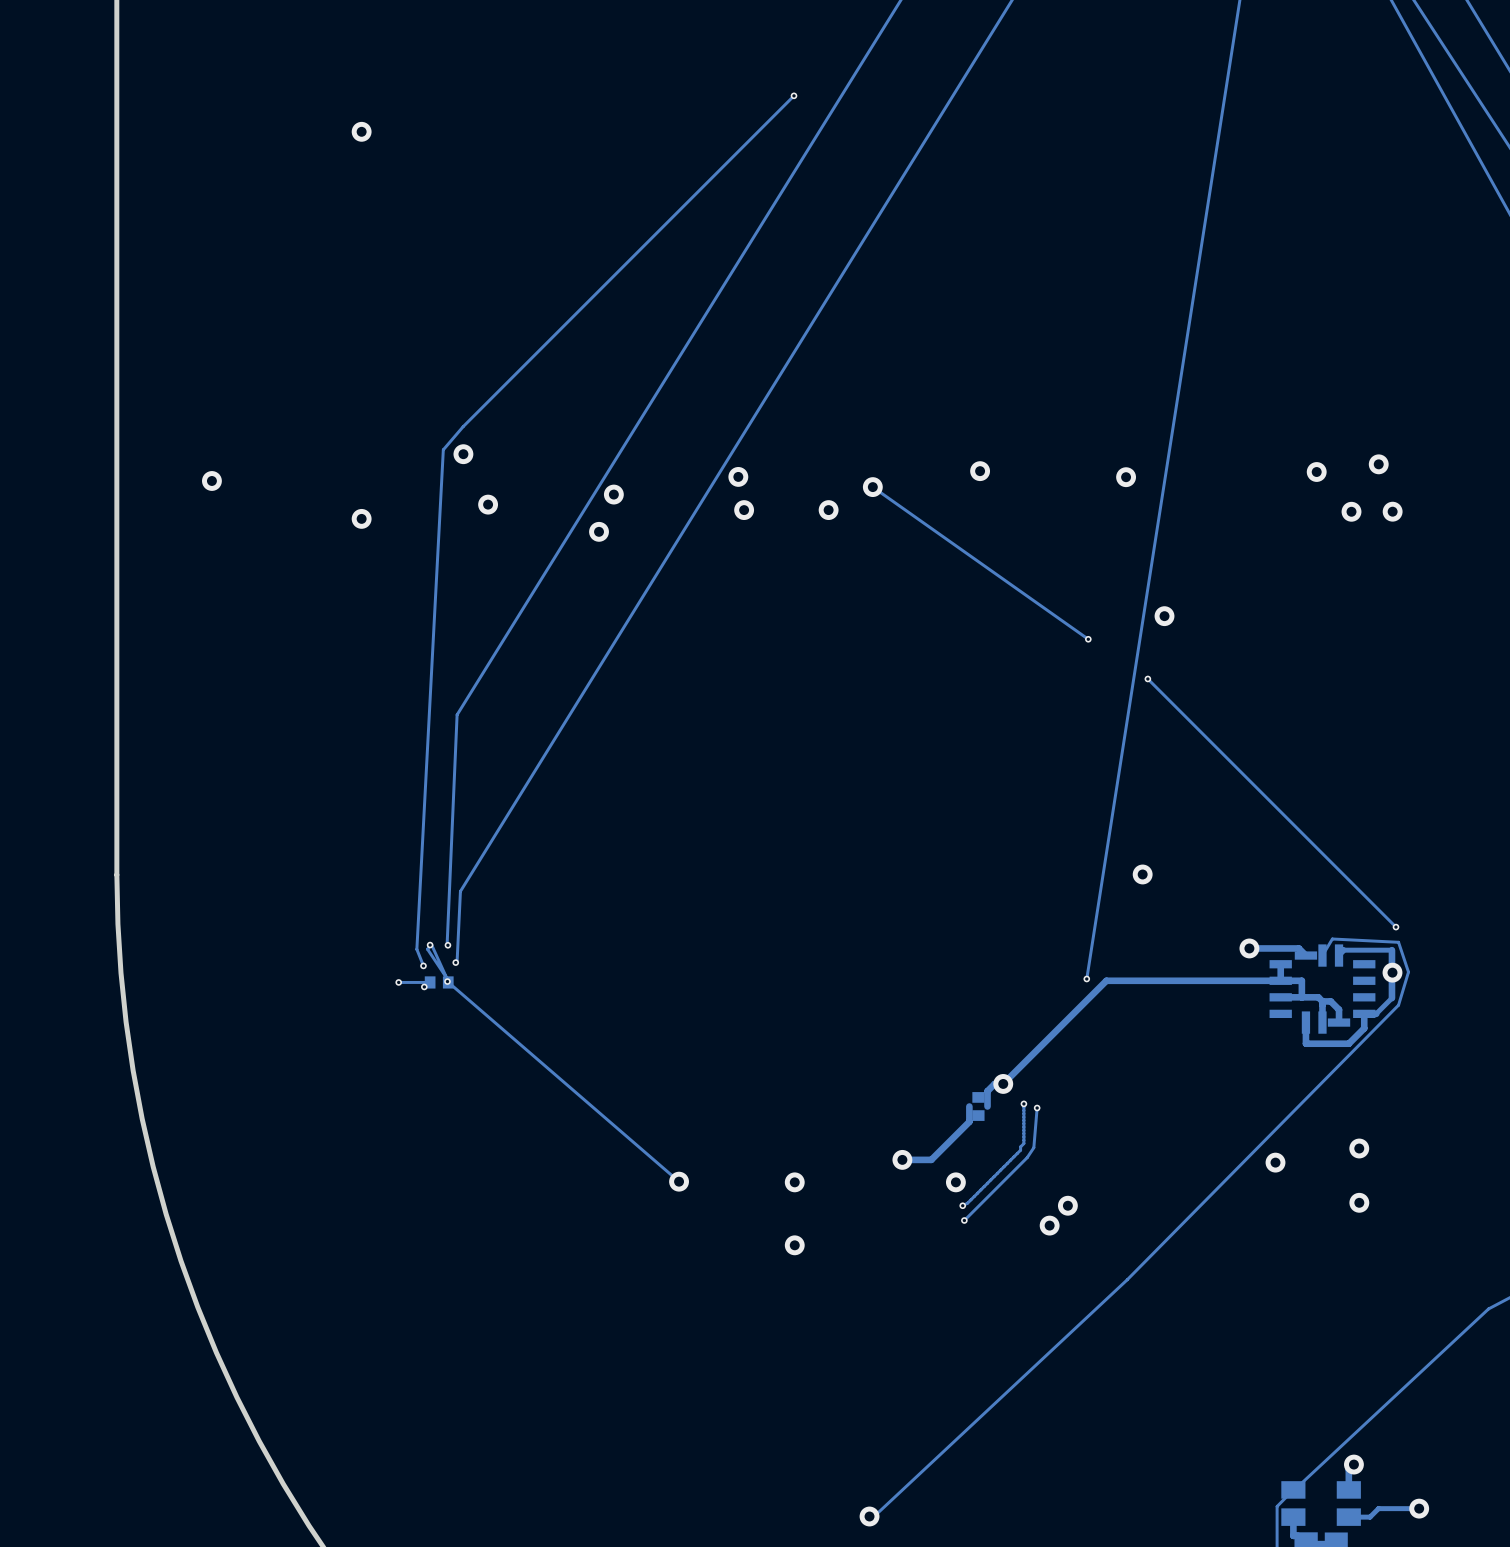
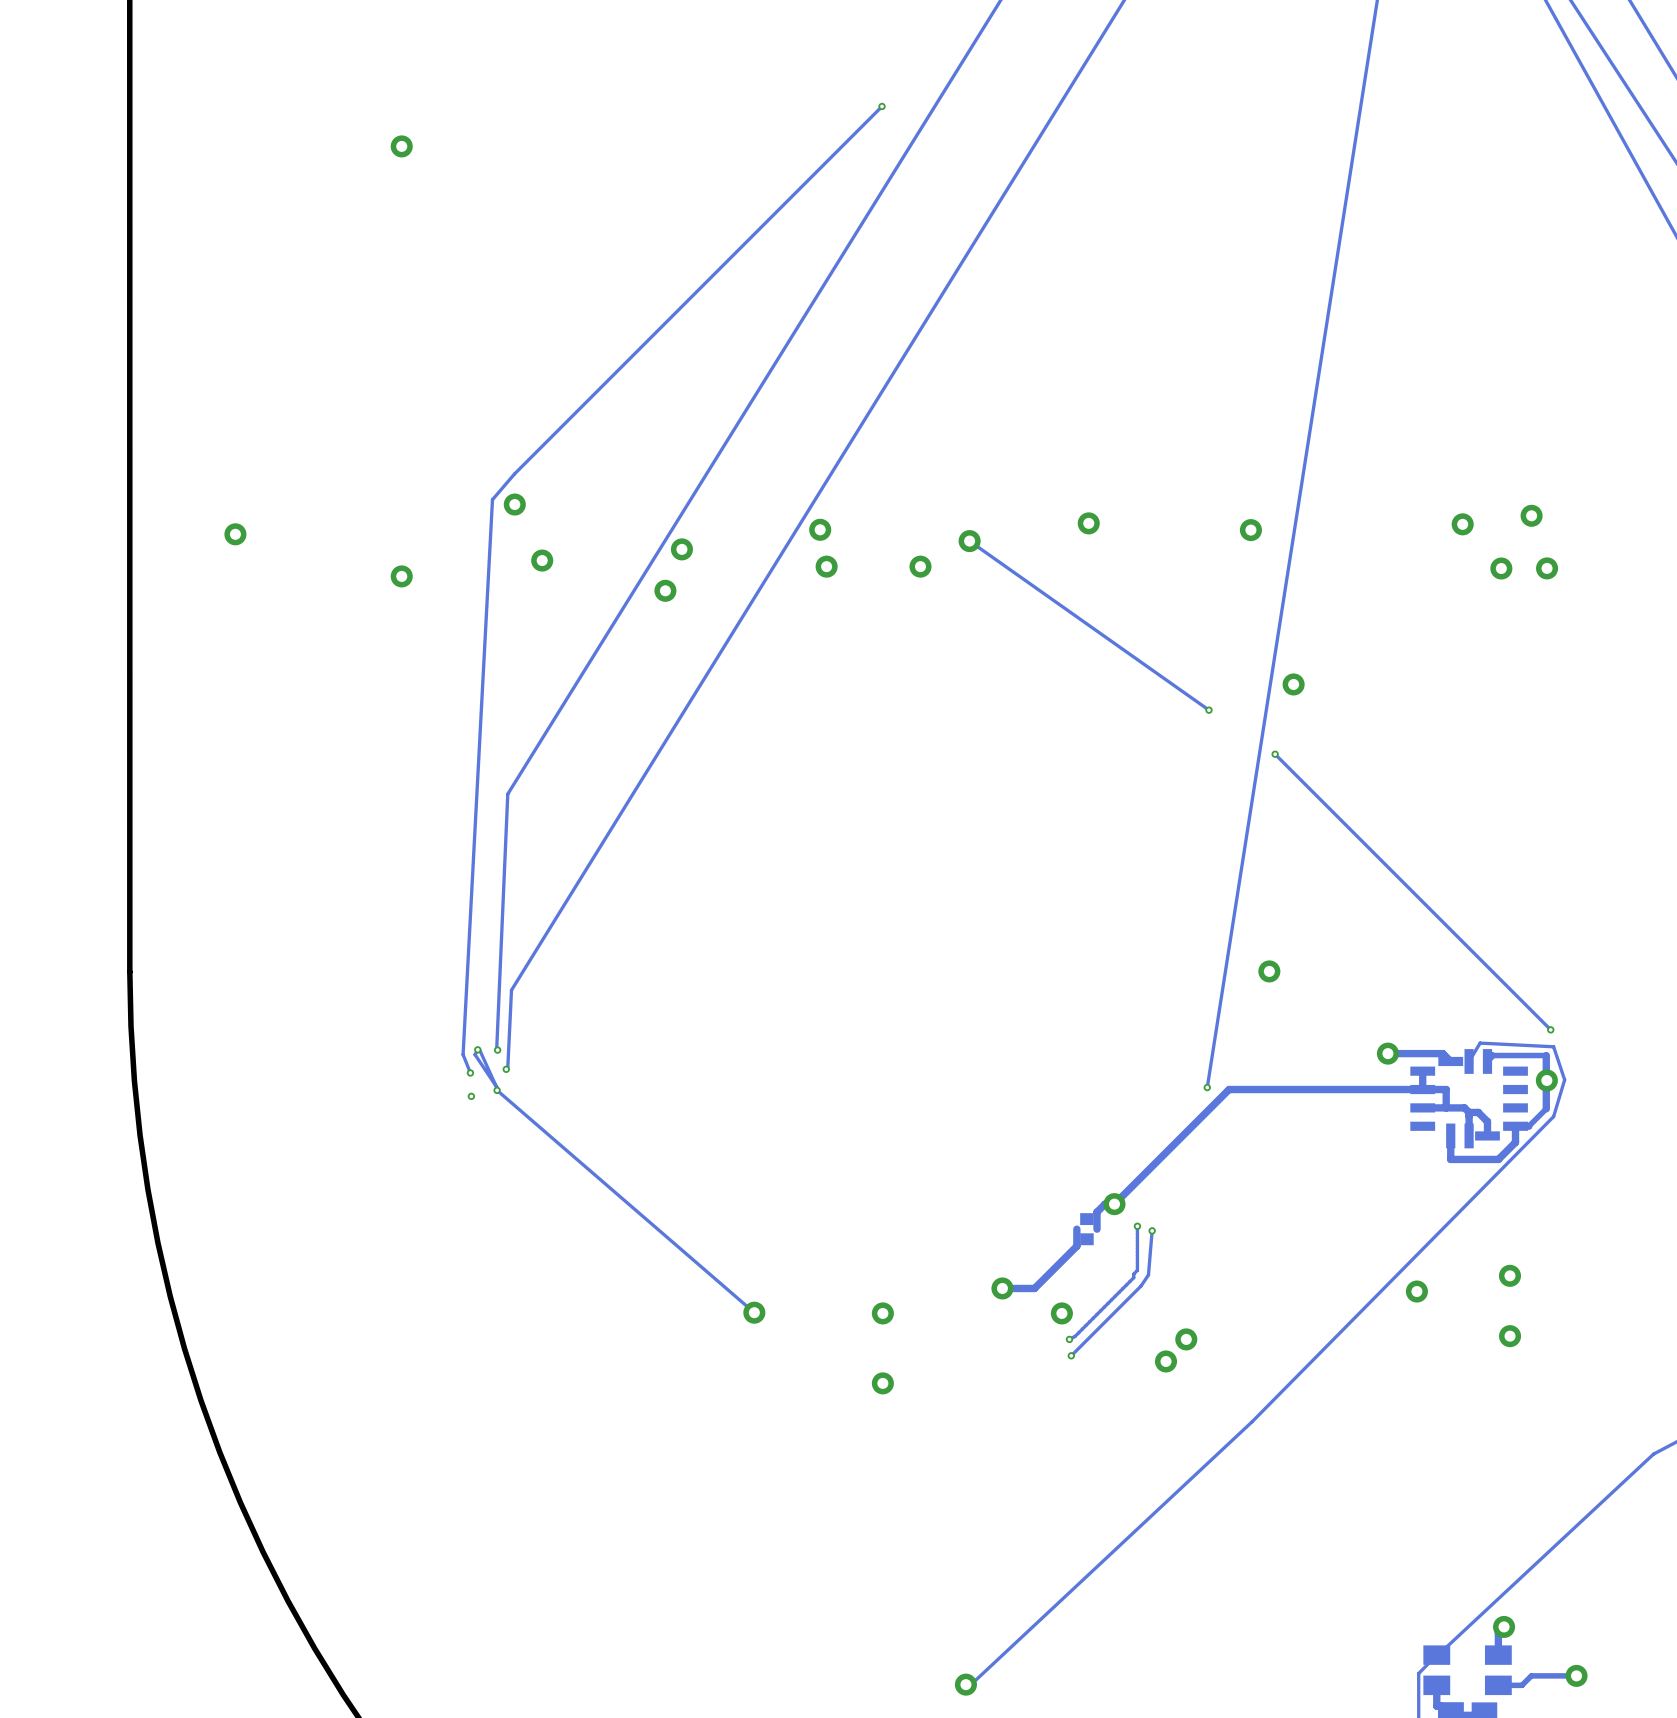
via: (398, 982) -> none
track: (430, 982) (400, 982) -> none
part: (439, 982) -> none

